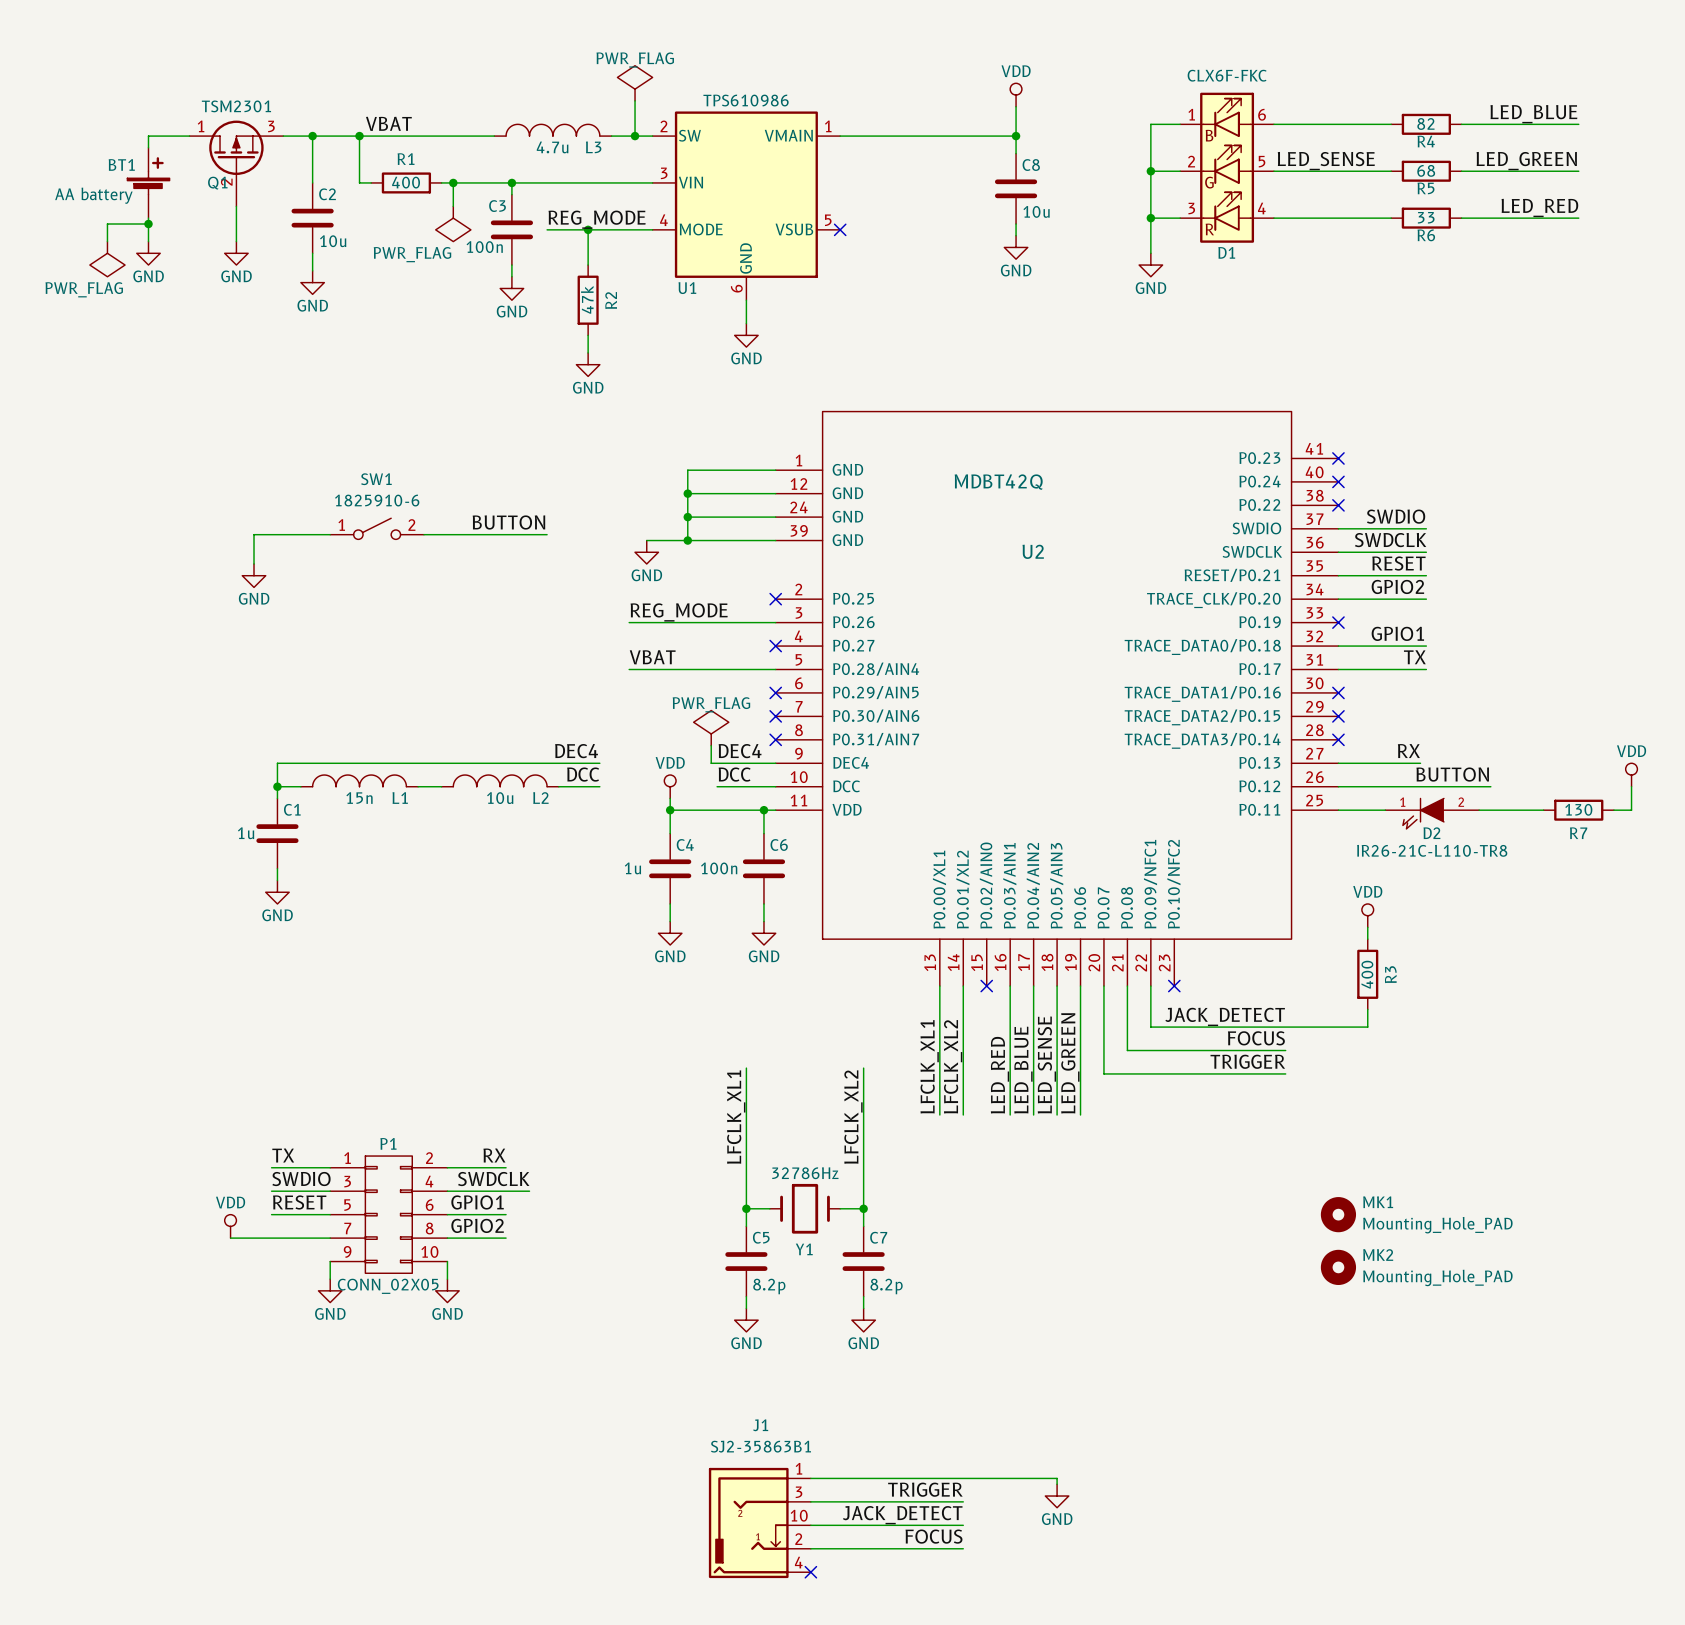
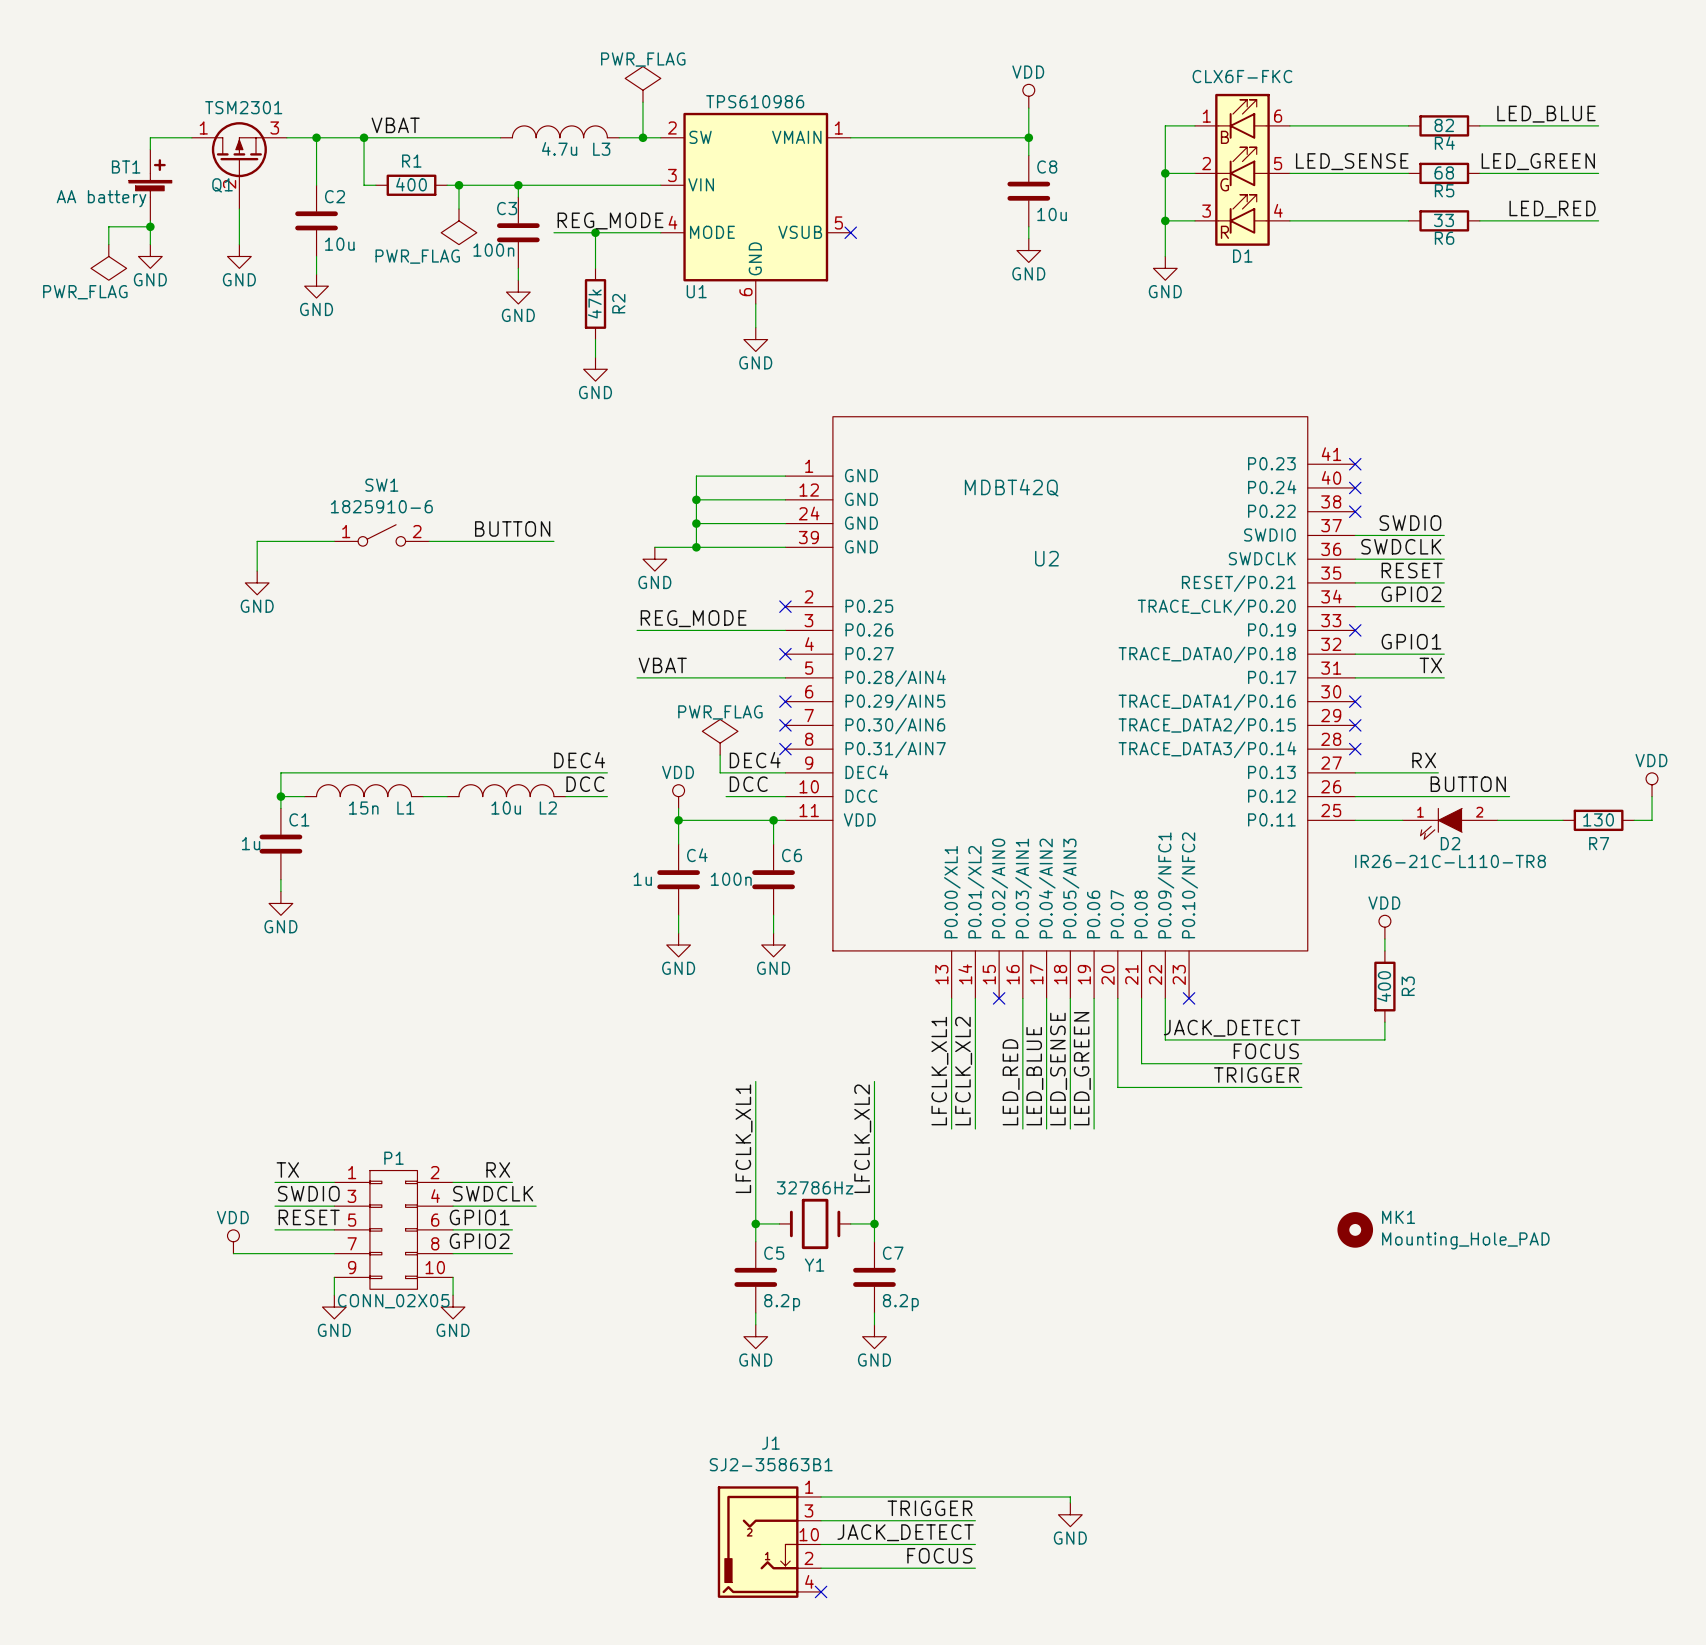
MK2: Mounting_Hole_PAD (1338, 1267) -> none

